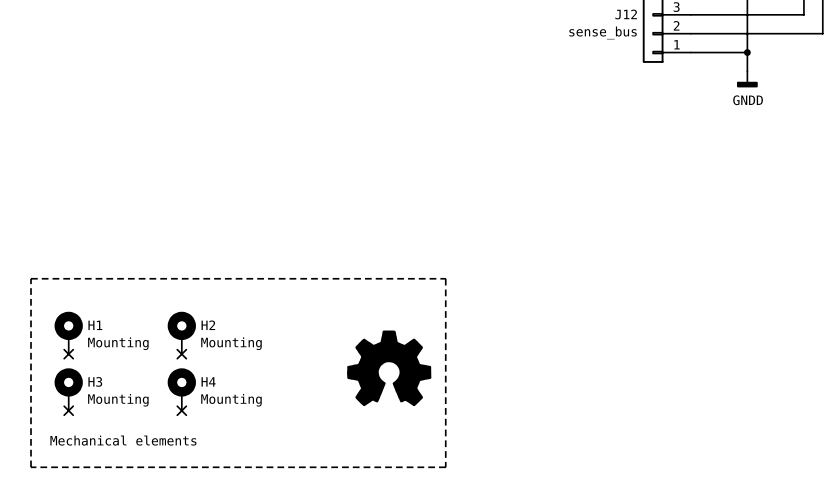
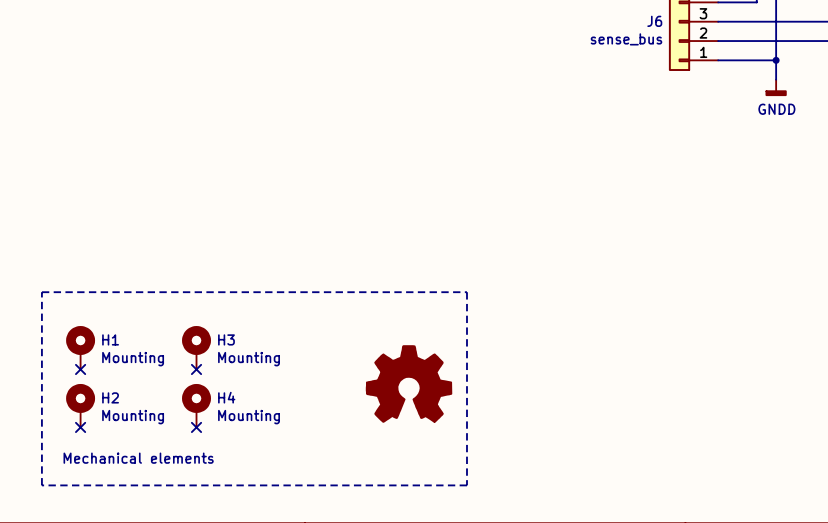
J12 name: J12 (626, 14) -> J6 (654, 21)
H2 name: H2 (208, 325) -> H3 (226, 339)
H3 name: H3 (95, 381) -> H2 (110, 397)

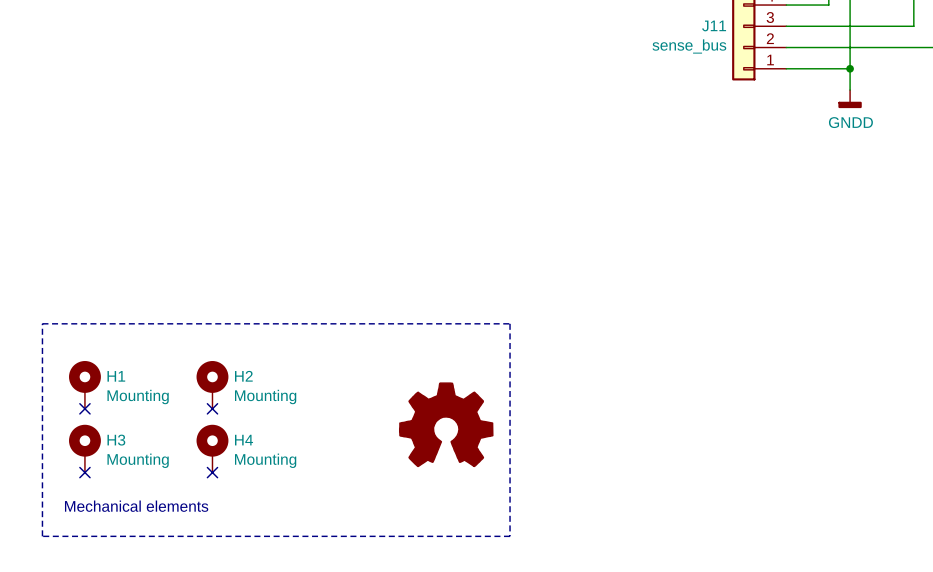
J6 name: J6 (654, 21) -> J11 (714, 25)
H3 name: H3 (226, 339) -> H2 (243, 376)
H2 name: H2 (110, 397) -> H3 (116, 440)

